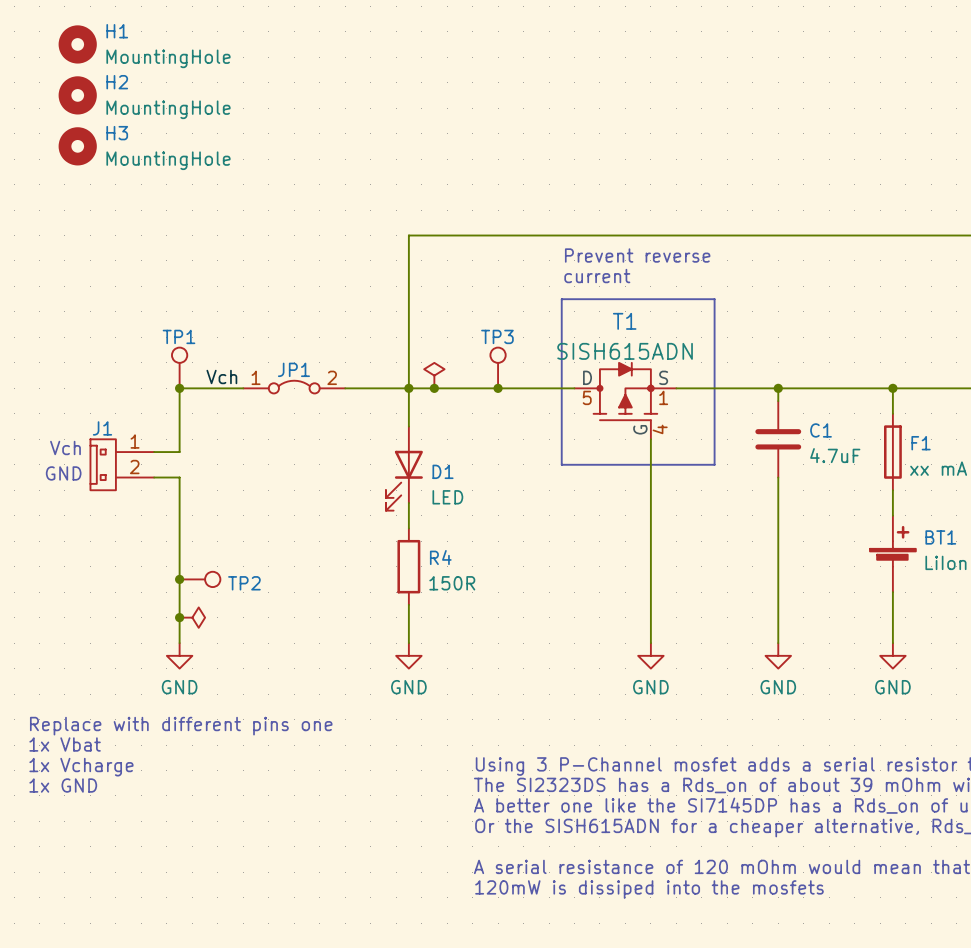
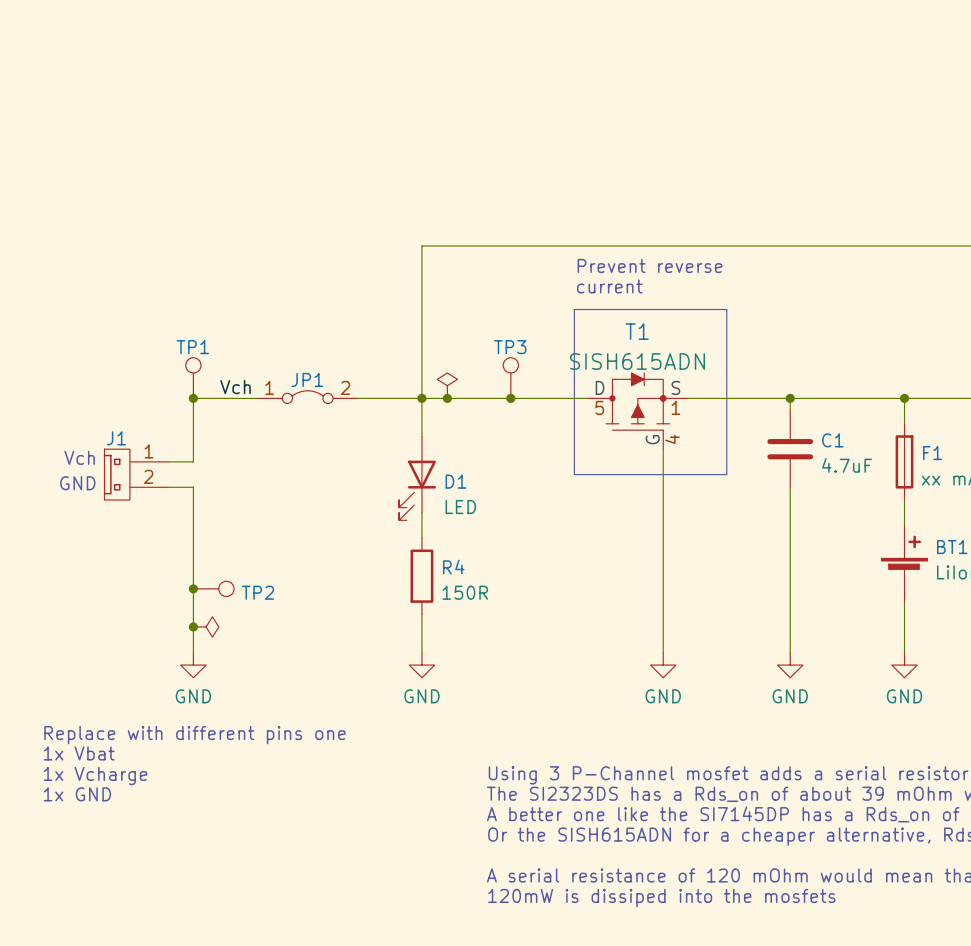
H1: MountingHole (77, 44) -> none
H2: MountingHole (77, 95) -> none
H3: MountingHole (77, 146) -> none

